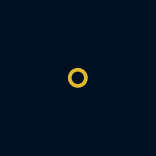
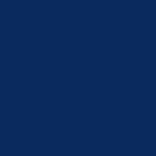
part: (77, 77) -> none

